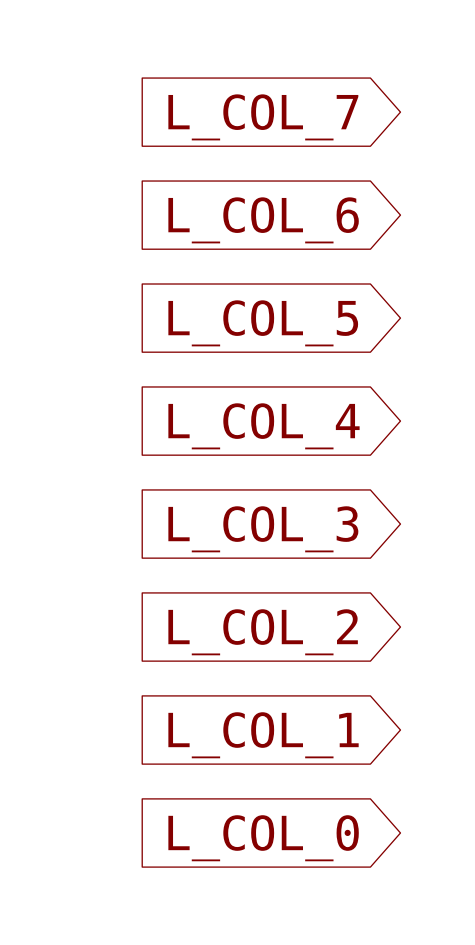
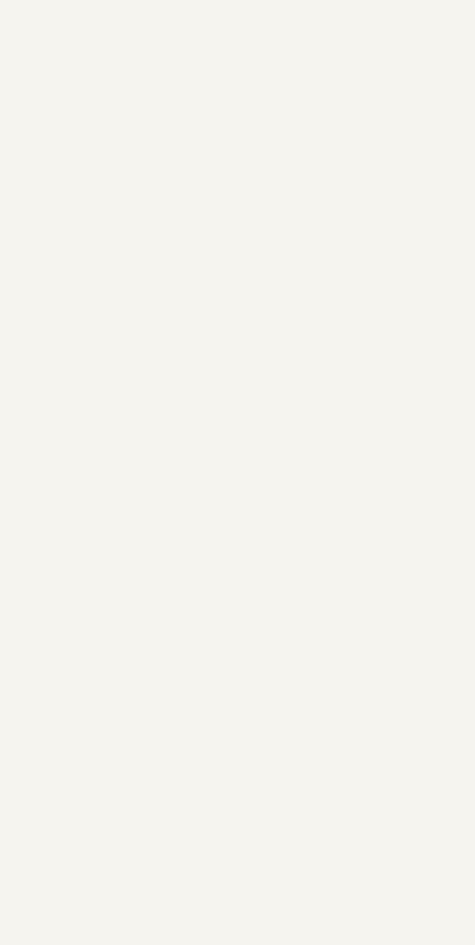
global label: L_COL_7 (263, 117) -> none
global label: L_COL_6 (263, 220) -> none
global label: L_COL_5 (263, 323) -> none
global label: L_COL_4 (263, 426) -> none
global label: L_COL_3 (263, 529) -> none
global label: L_COL_2 (263, 632) -> none
global label: L_COL_1 (263, 735) -> none
global label: L_COL_0 (263, 838) -> none

